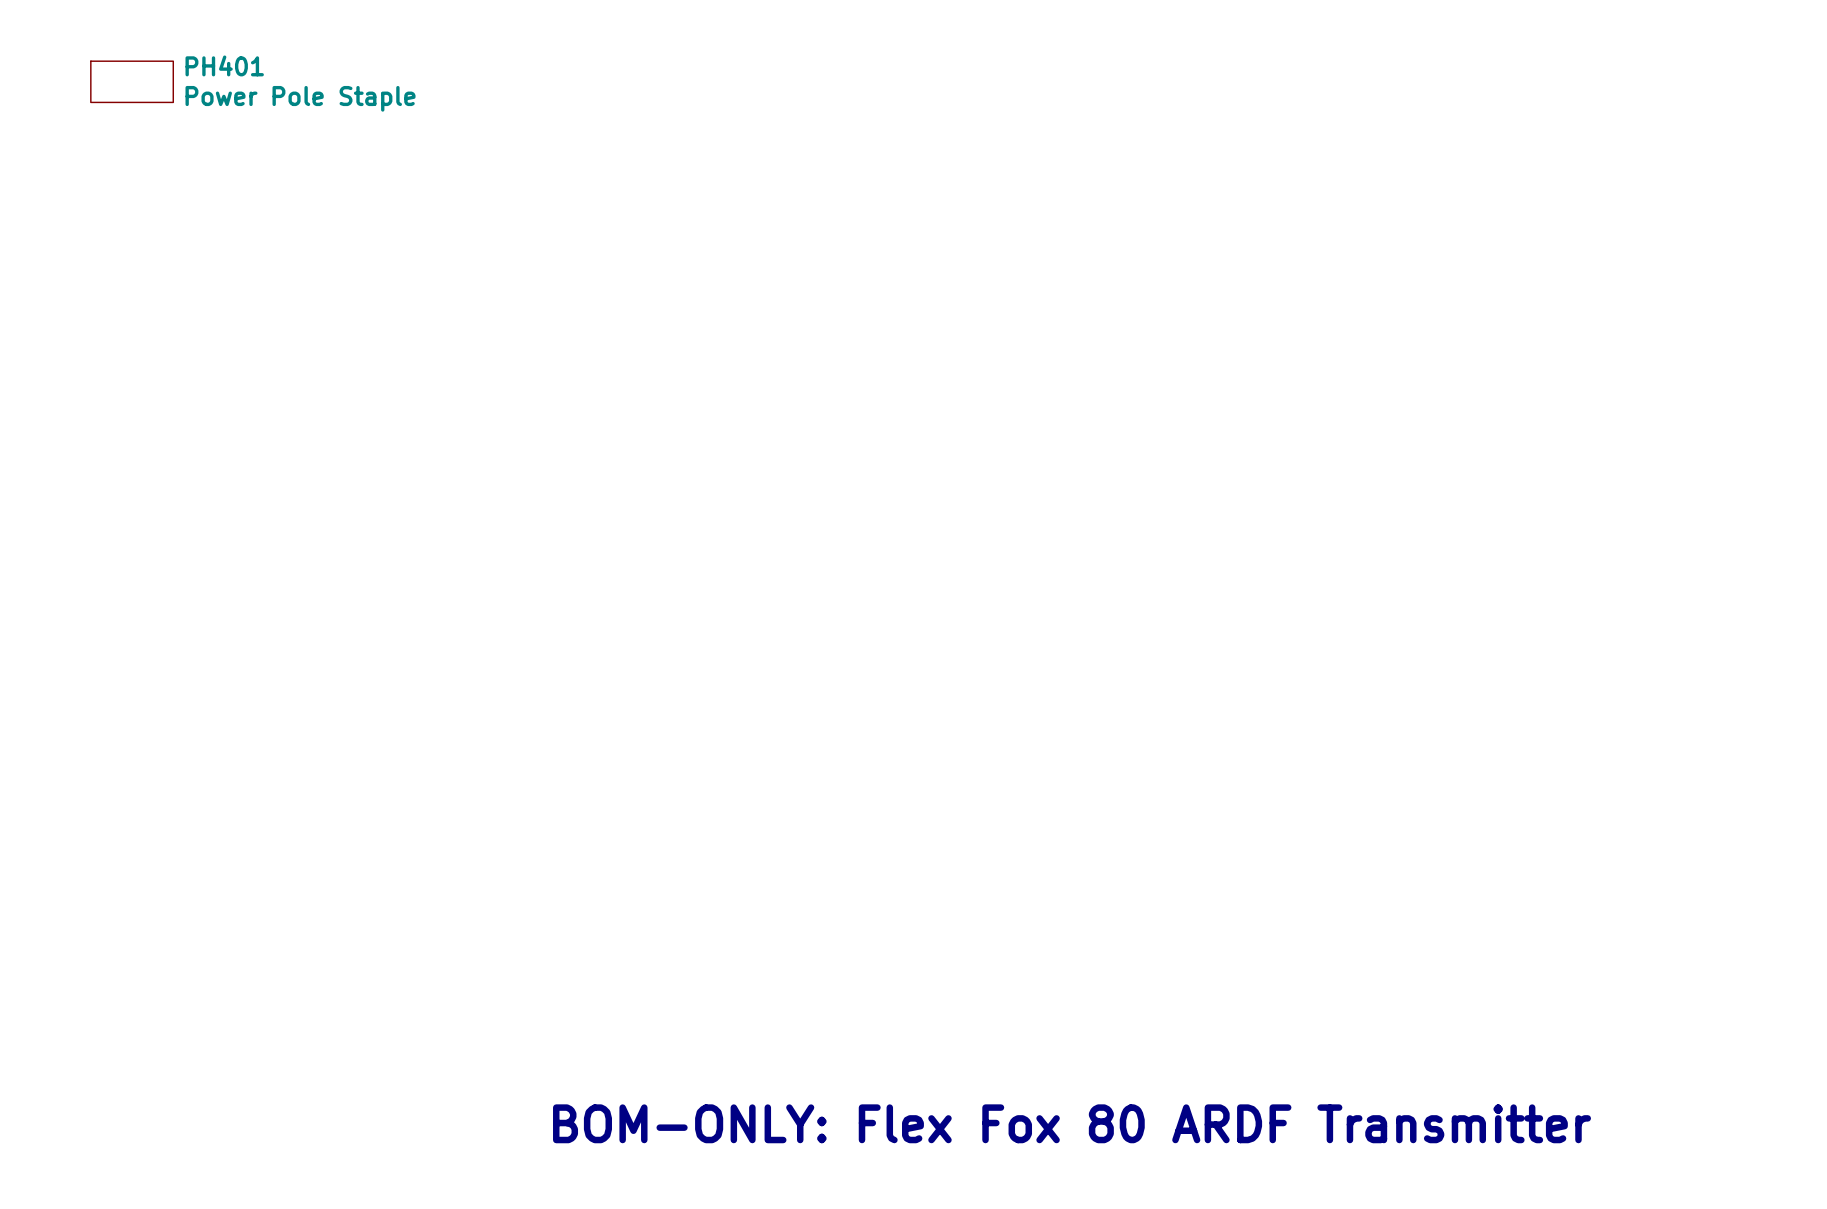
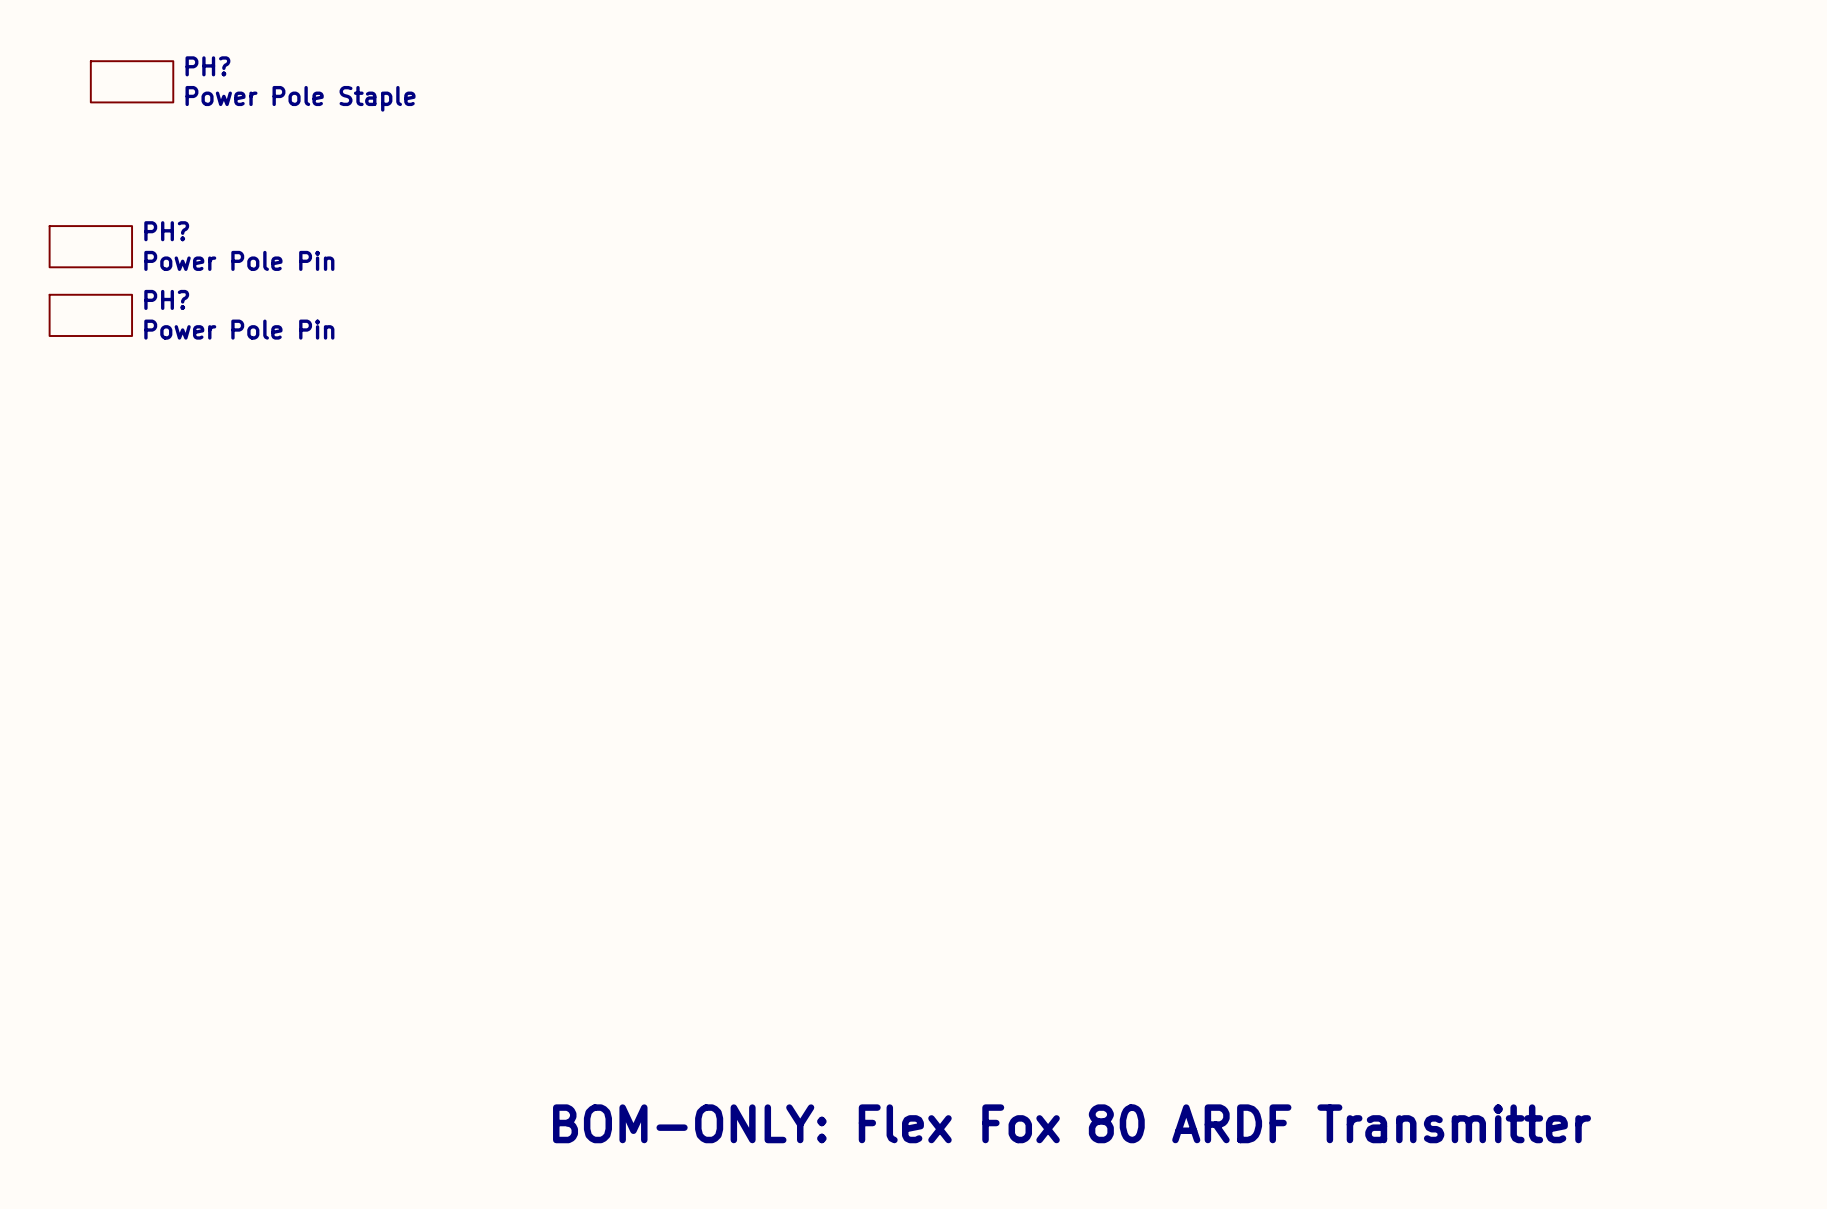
PH401 name: PH401 (224, 65) -> PH? (207, 66)
PH?: none -> Power Pole Pin (90, 246)
PH?: none -> Power Pole Pin (90, 315)

